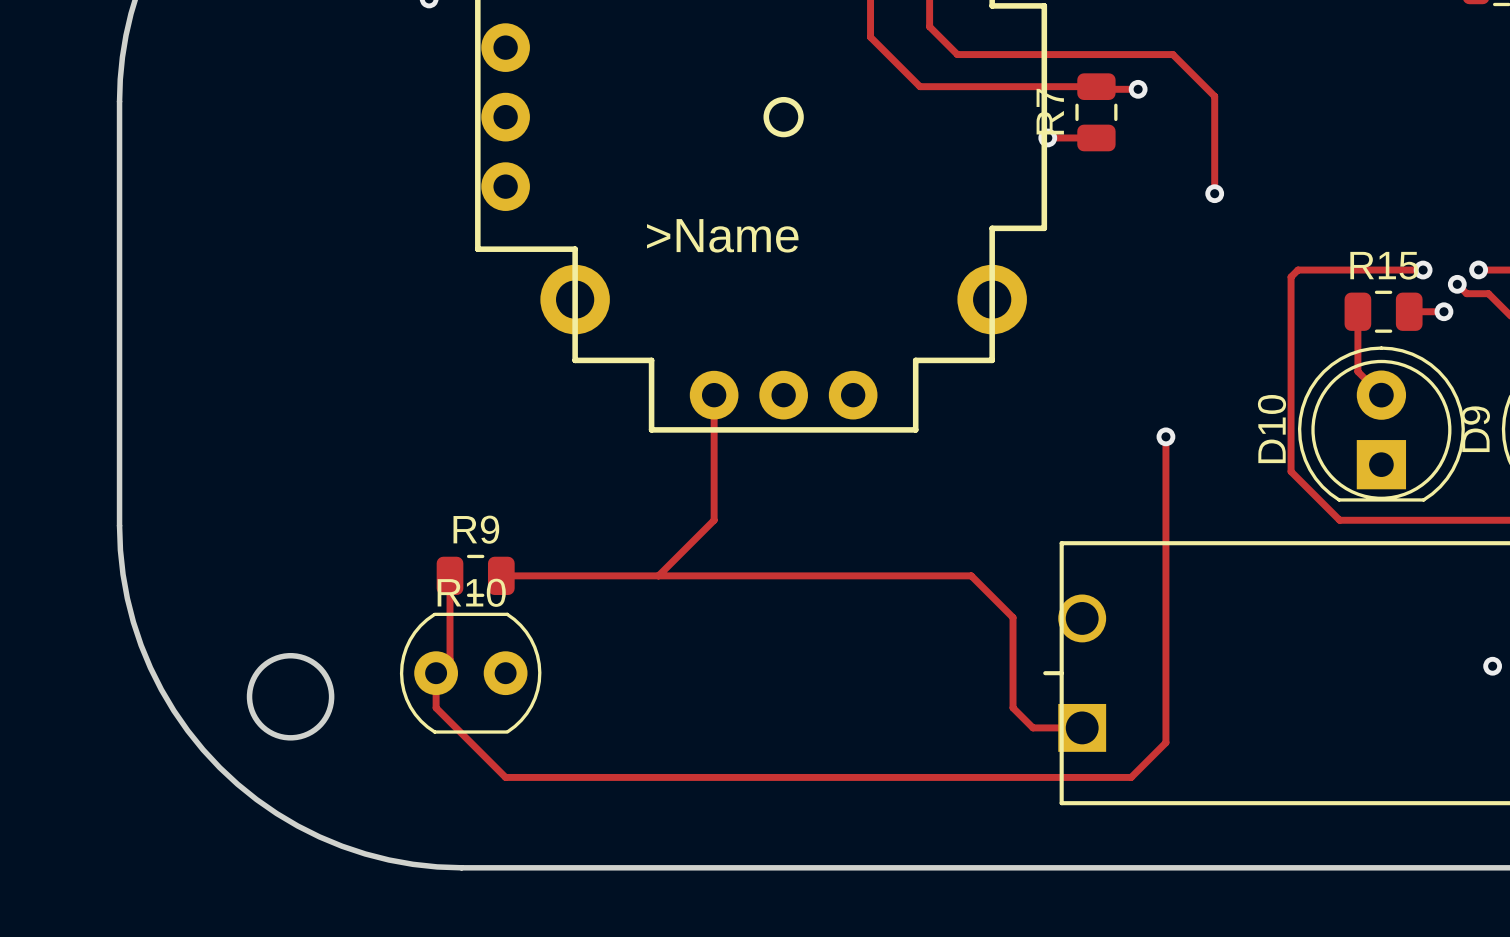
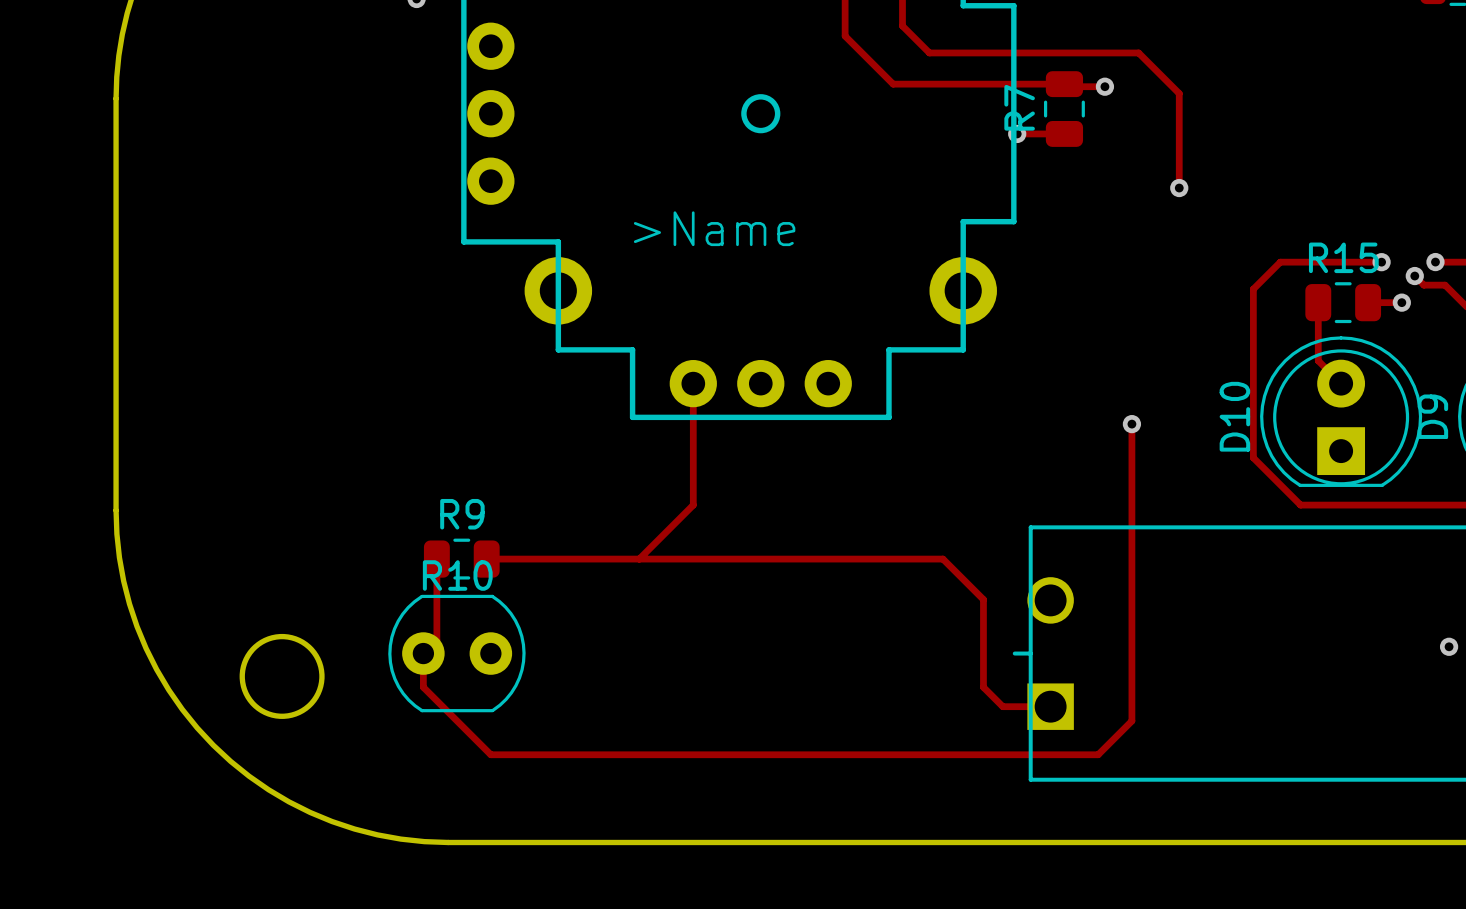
track: (1318, 270) (1298, 270) (1291, 276) (1291, 297) -> (1280, 262) (1253, 289)

